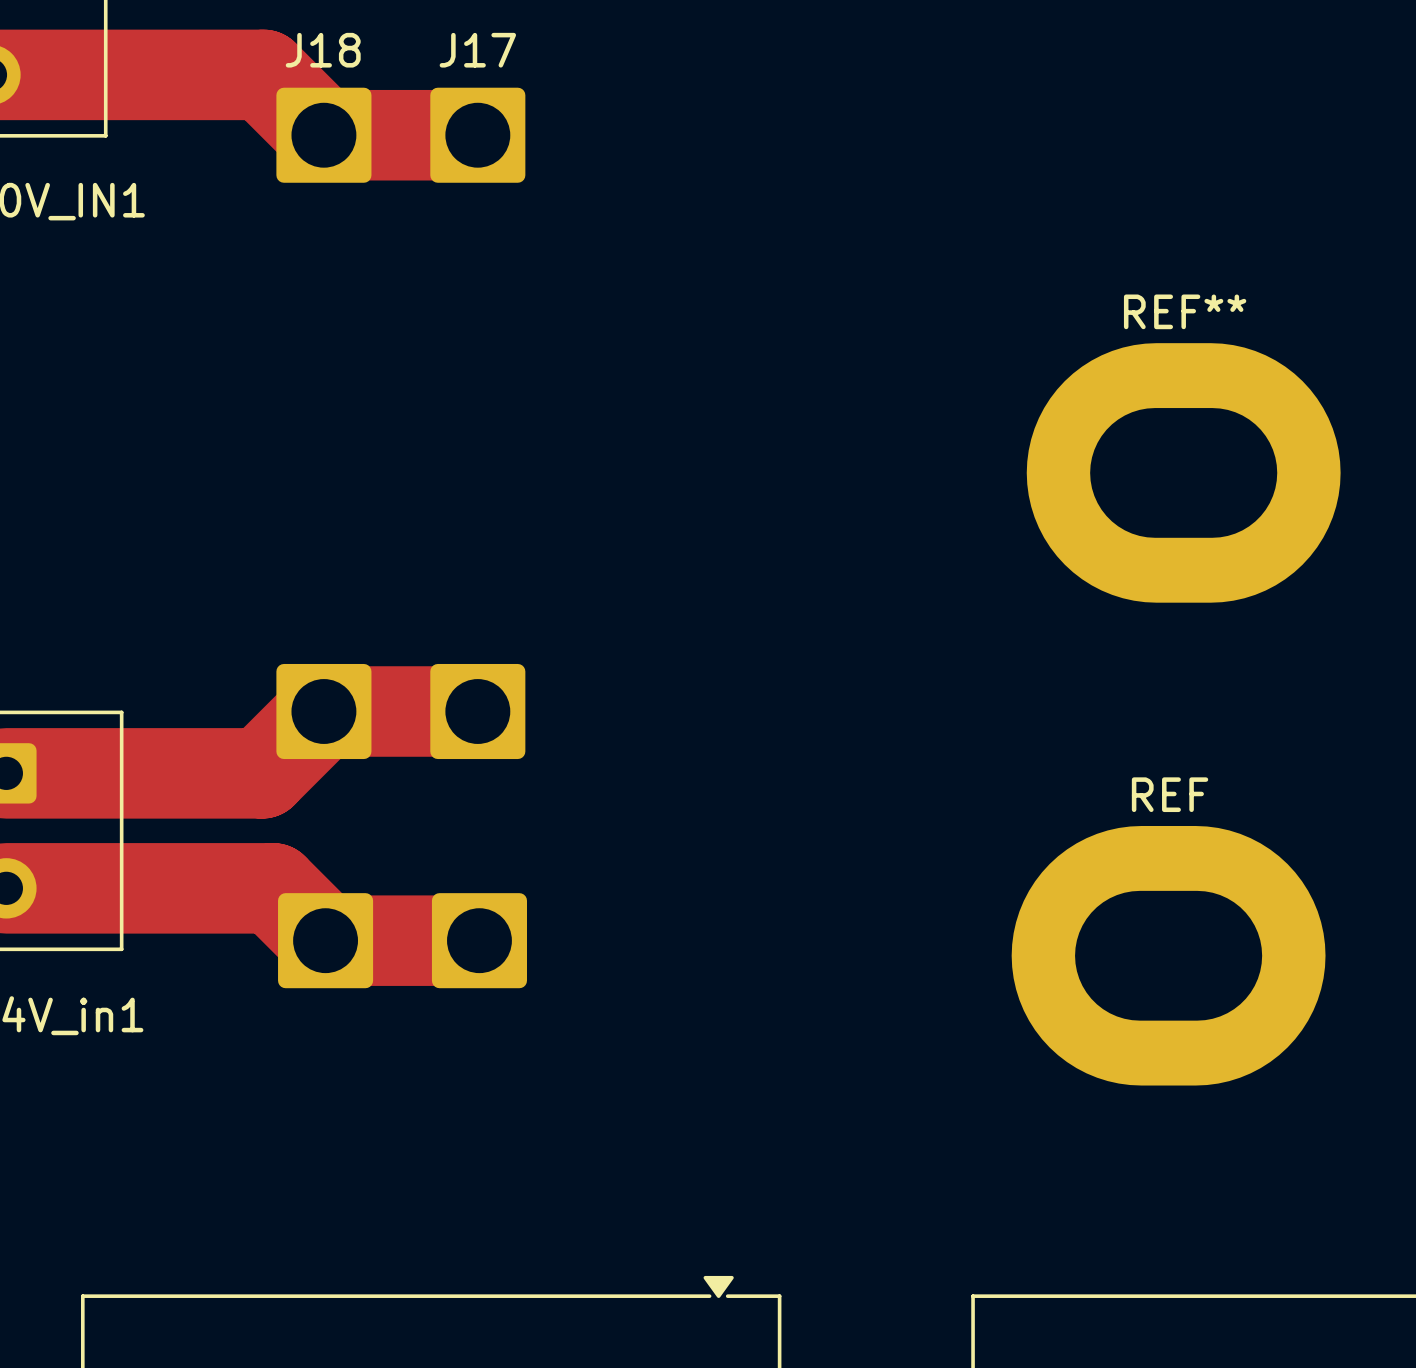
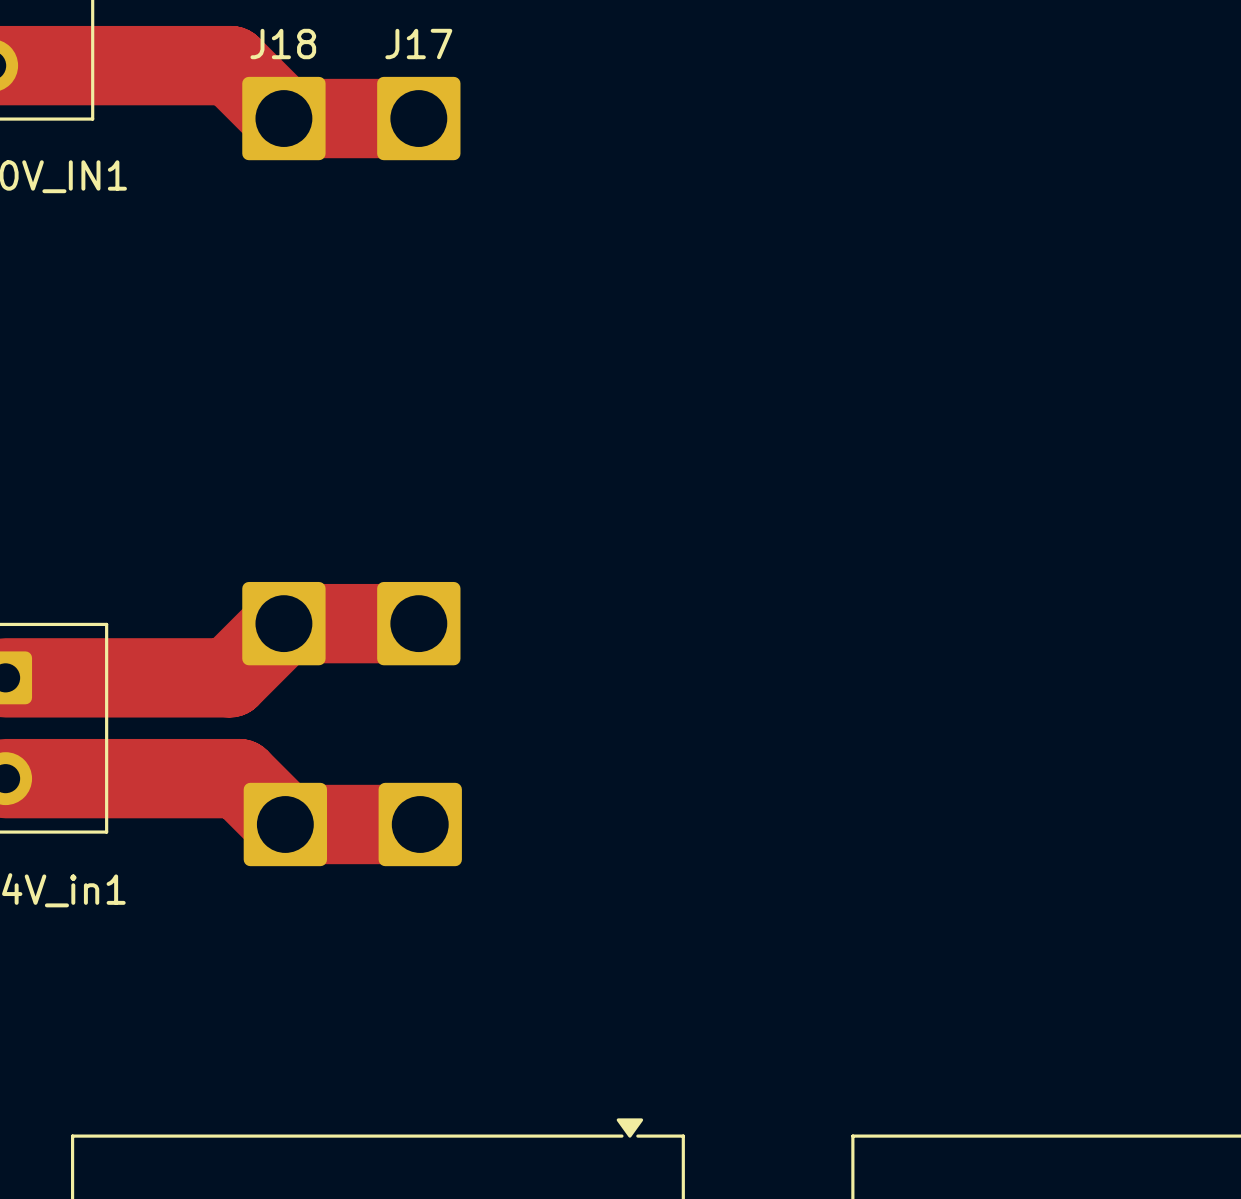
REF**: (1183, 472) -> none
REF: (1168, 955) -> none

